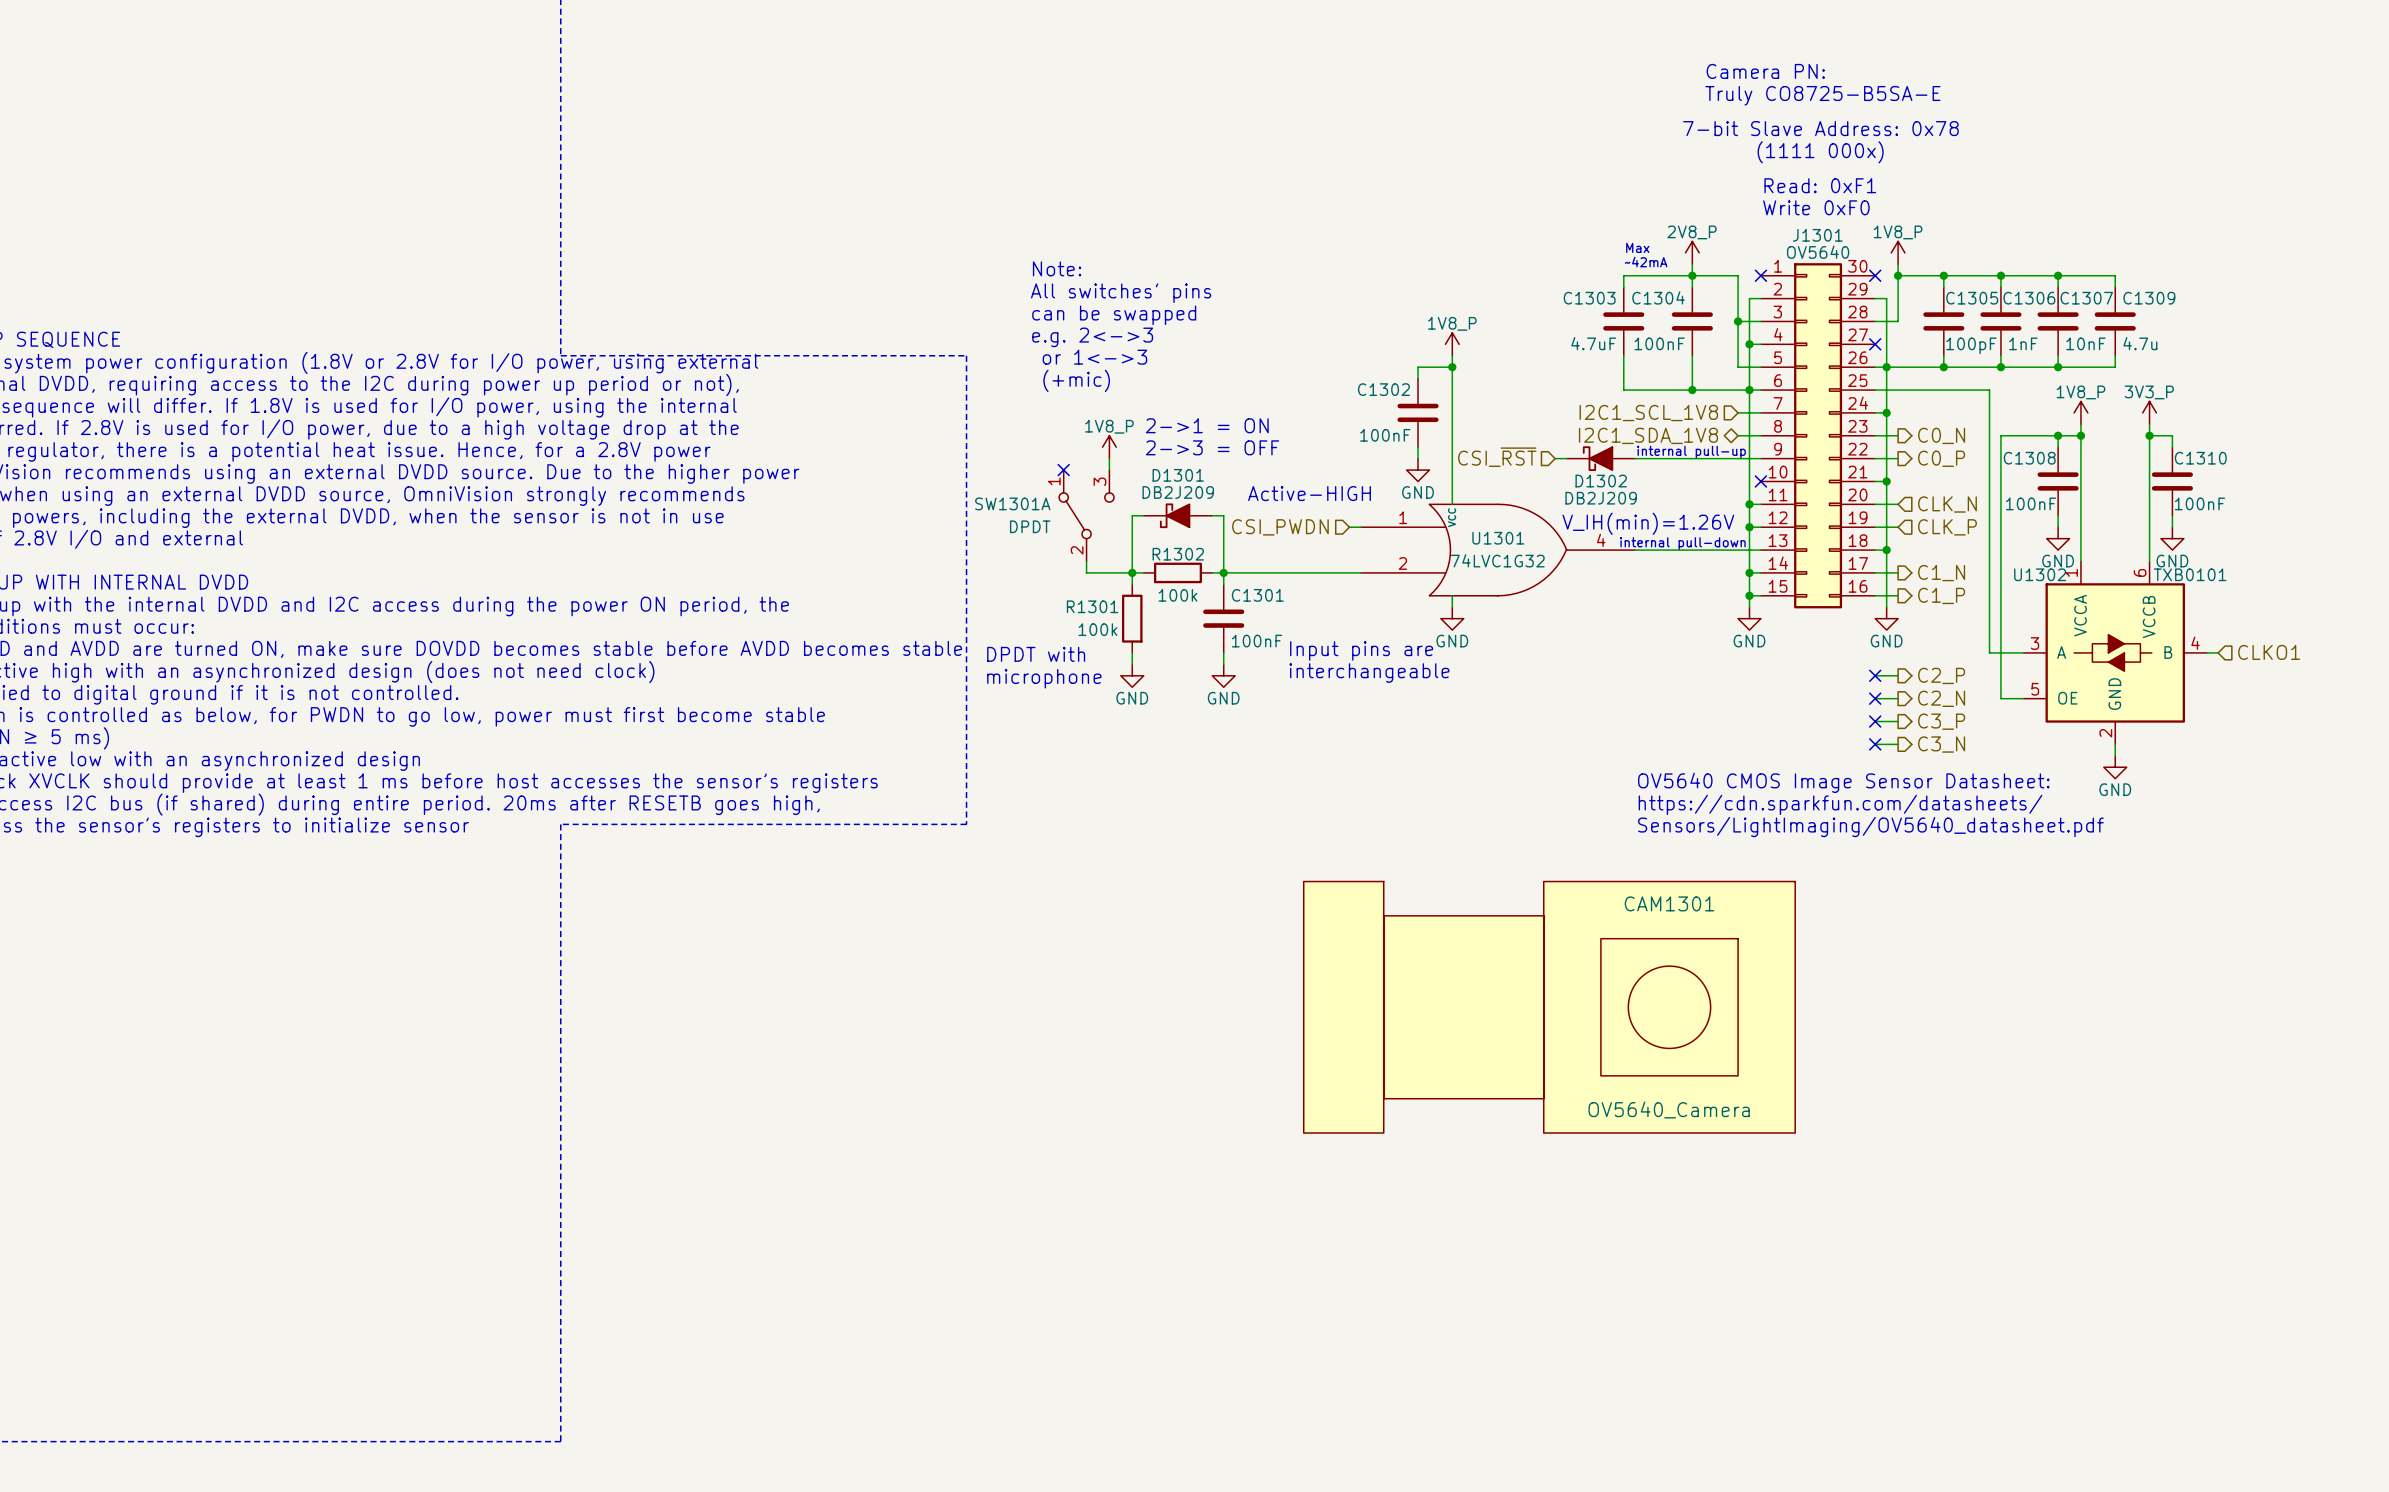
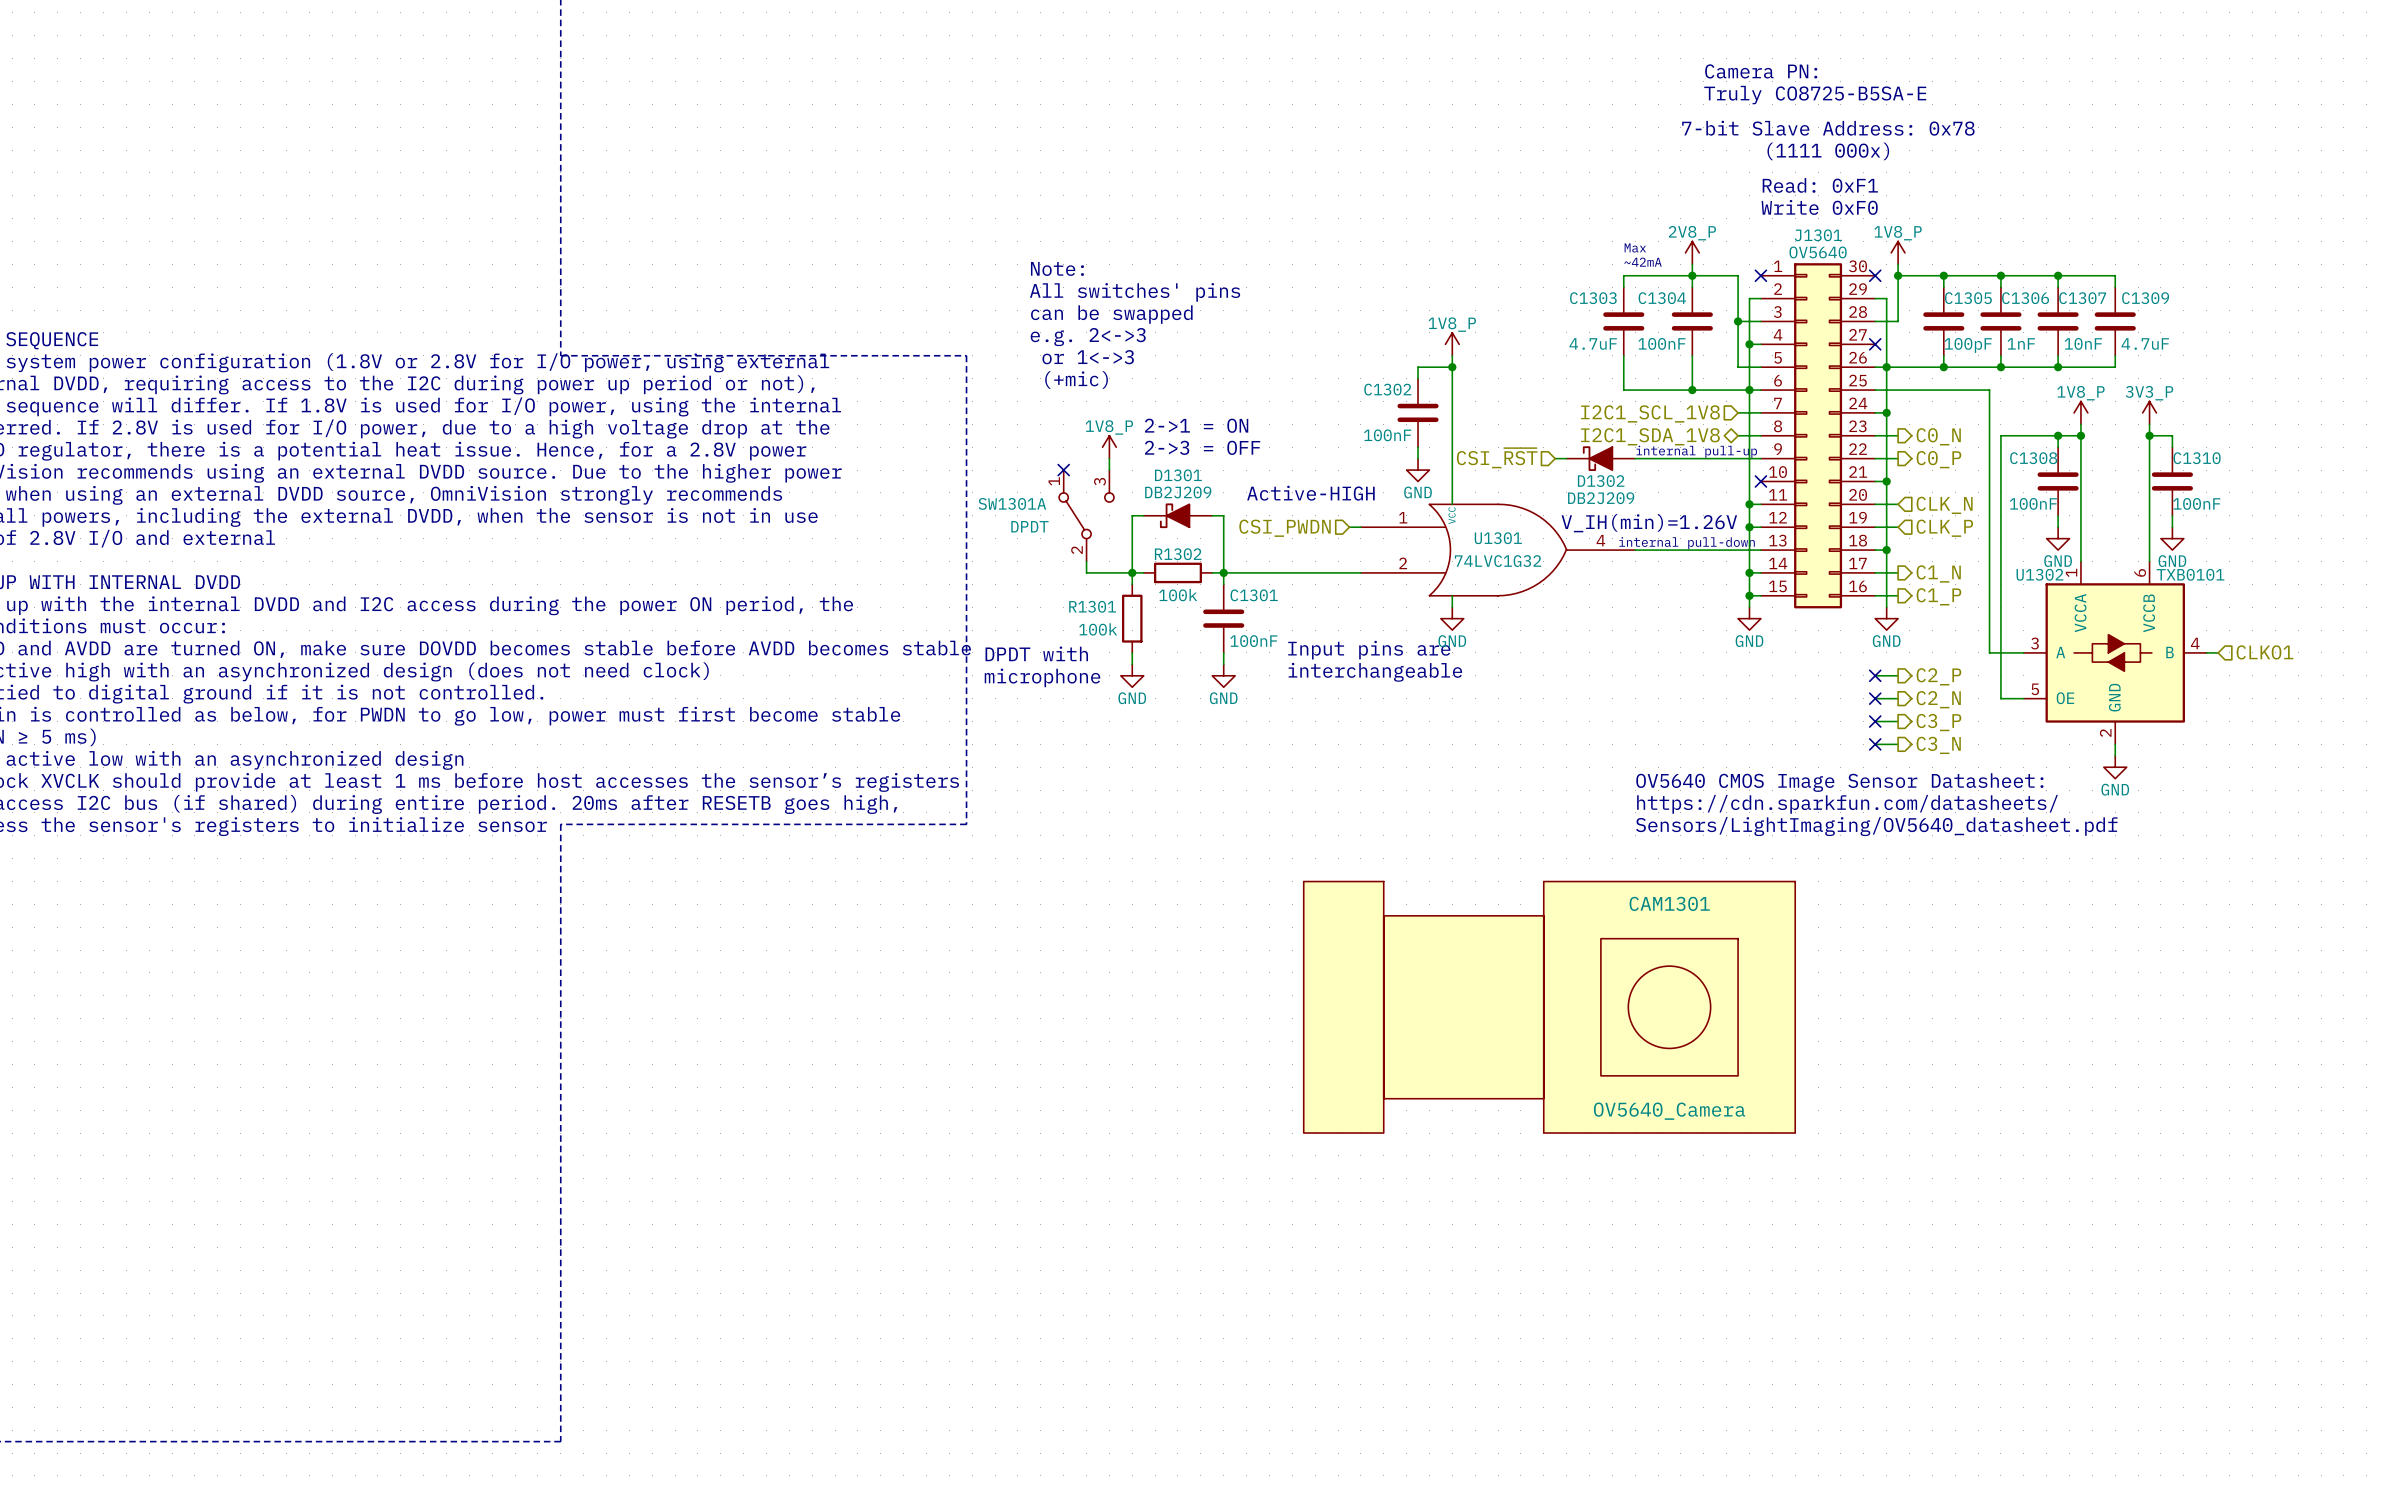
C1309 value: 4.7u (2140, 343) -> 4.7uF (2145, 344)

